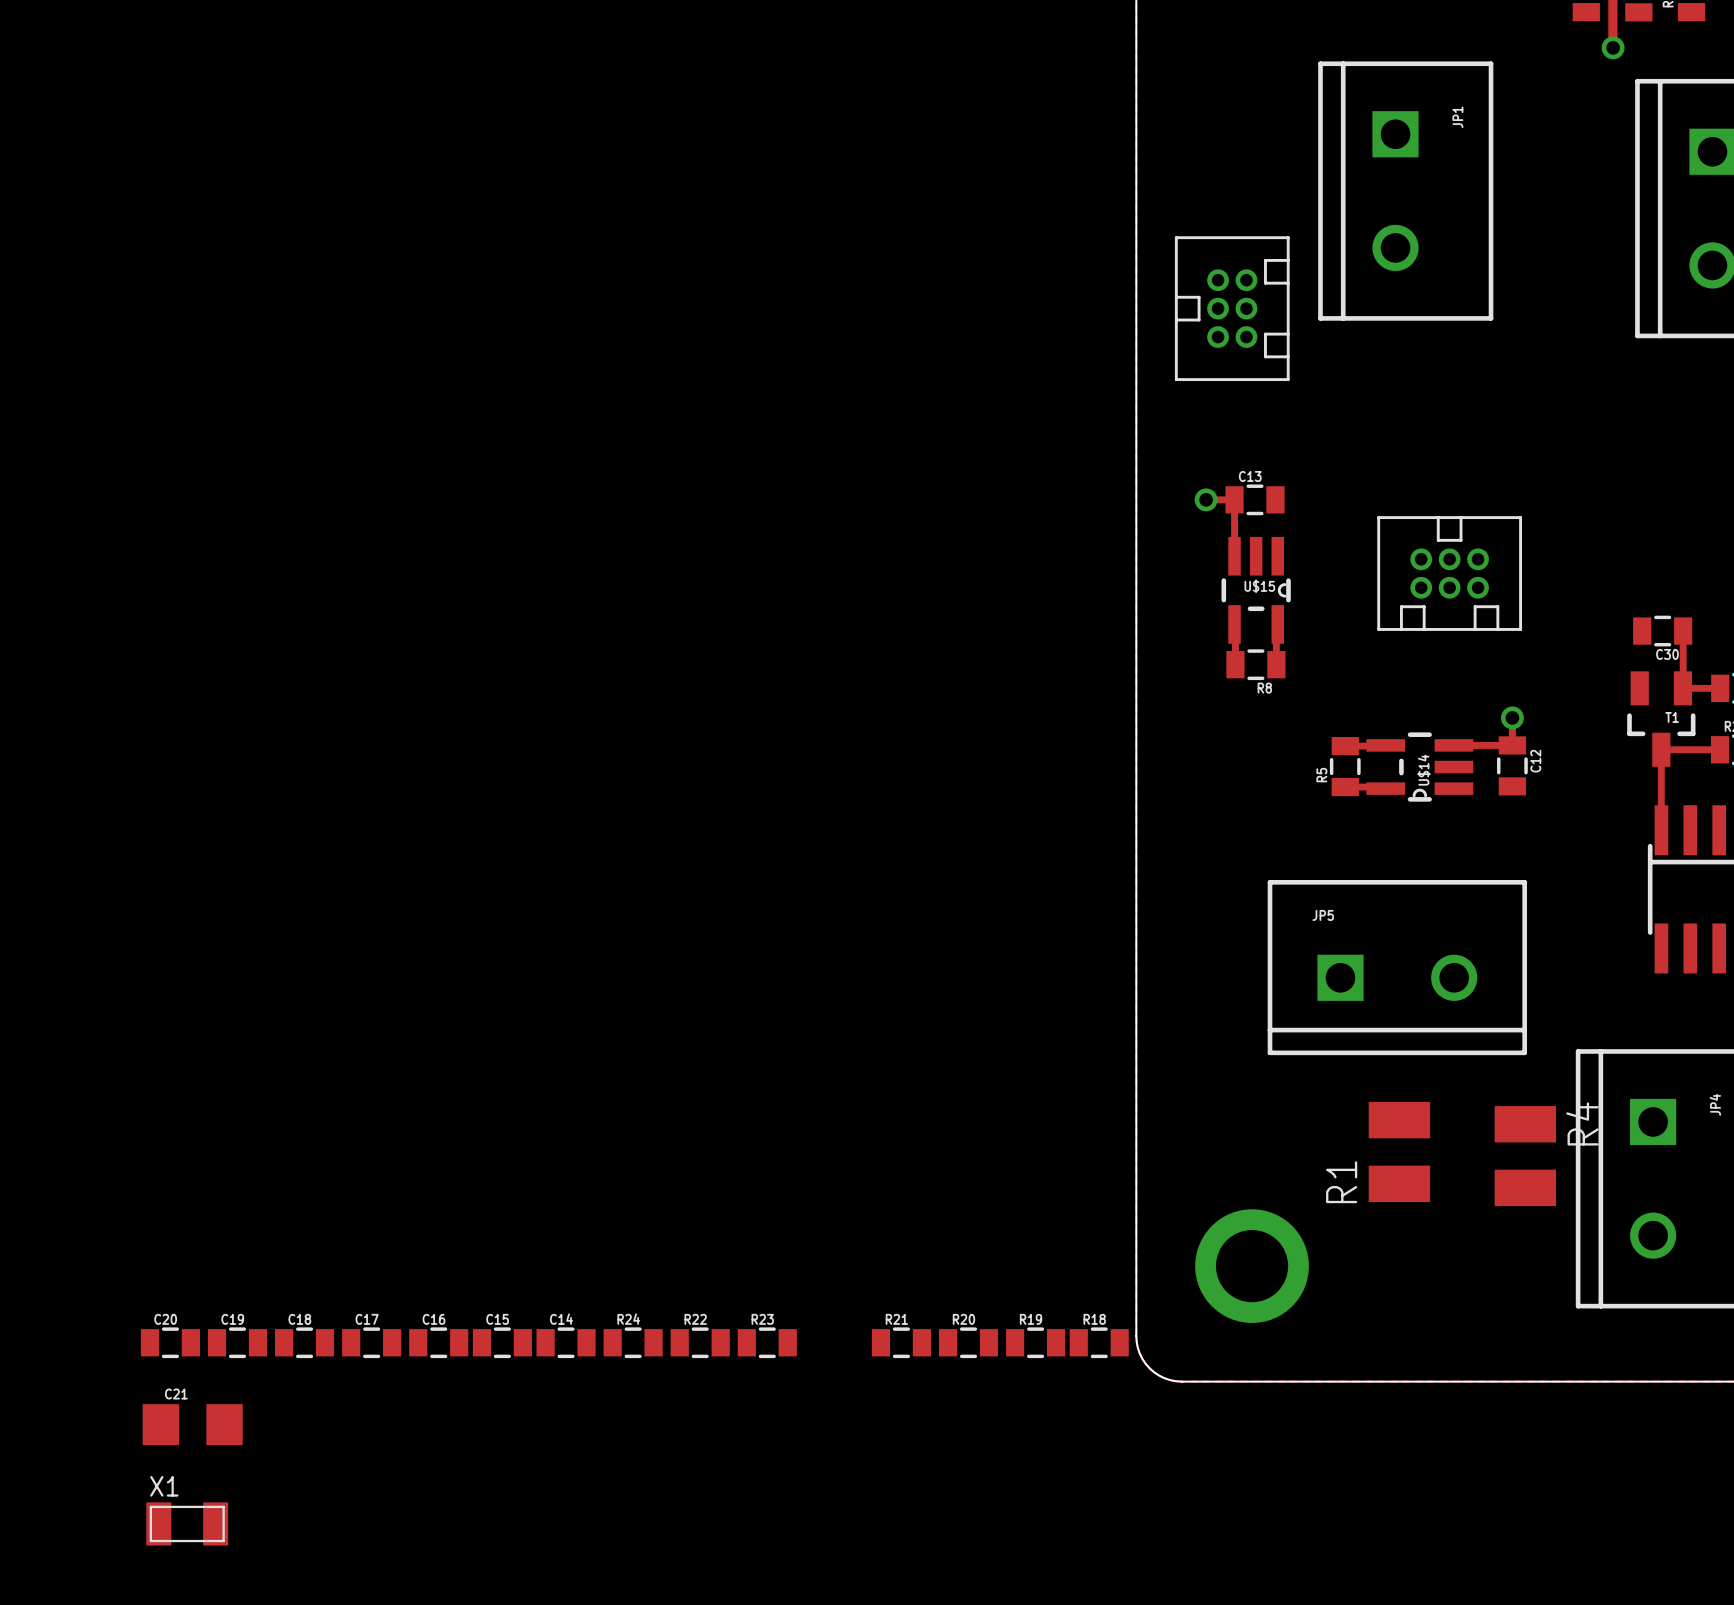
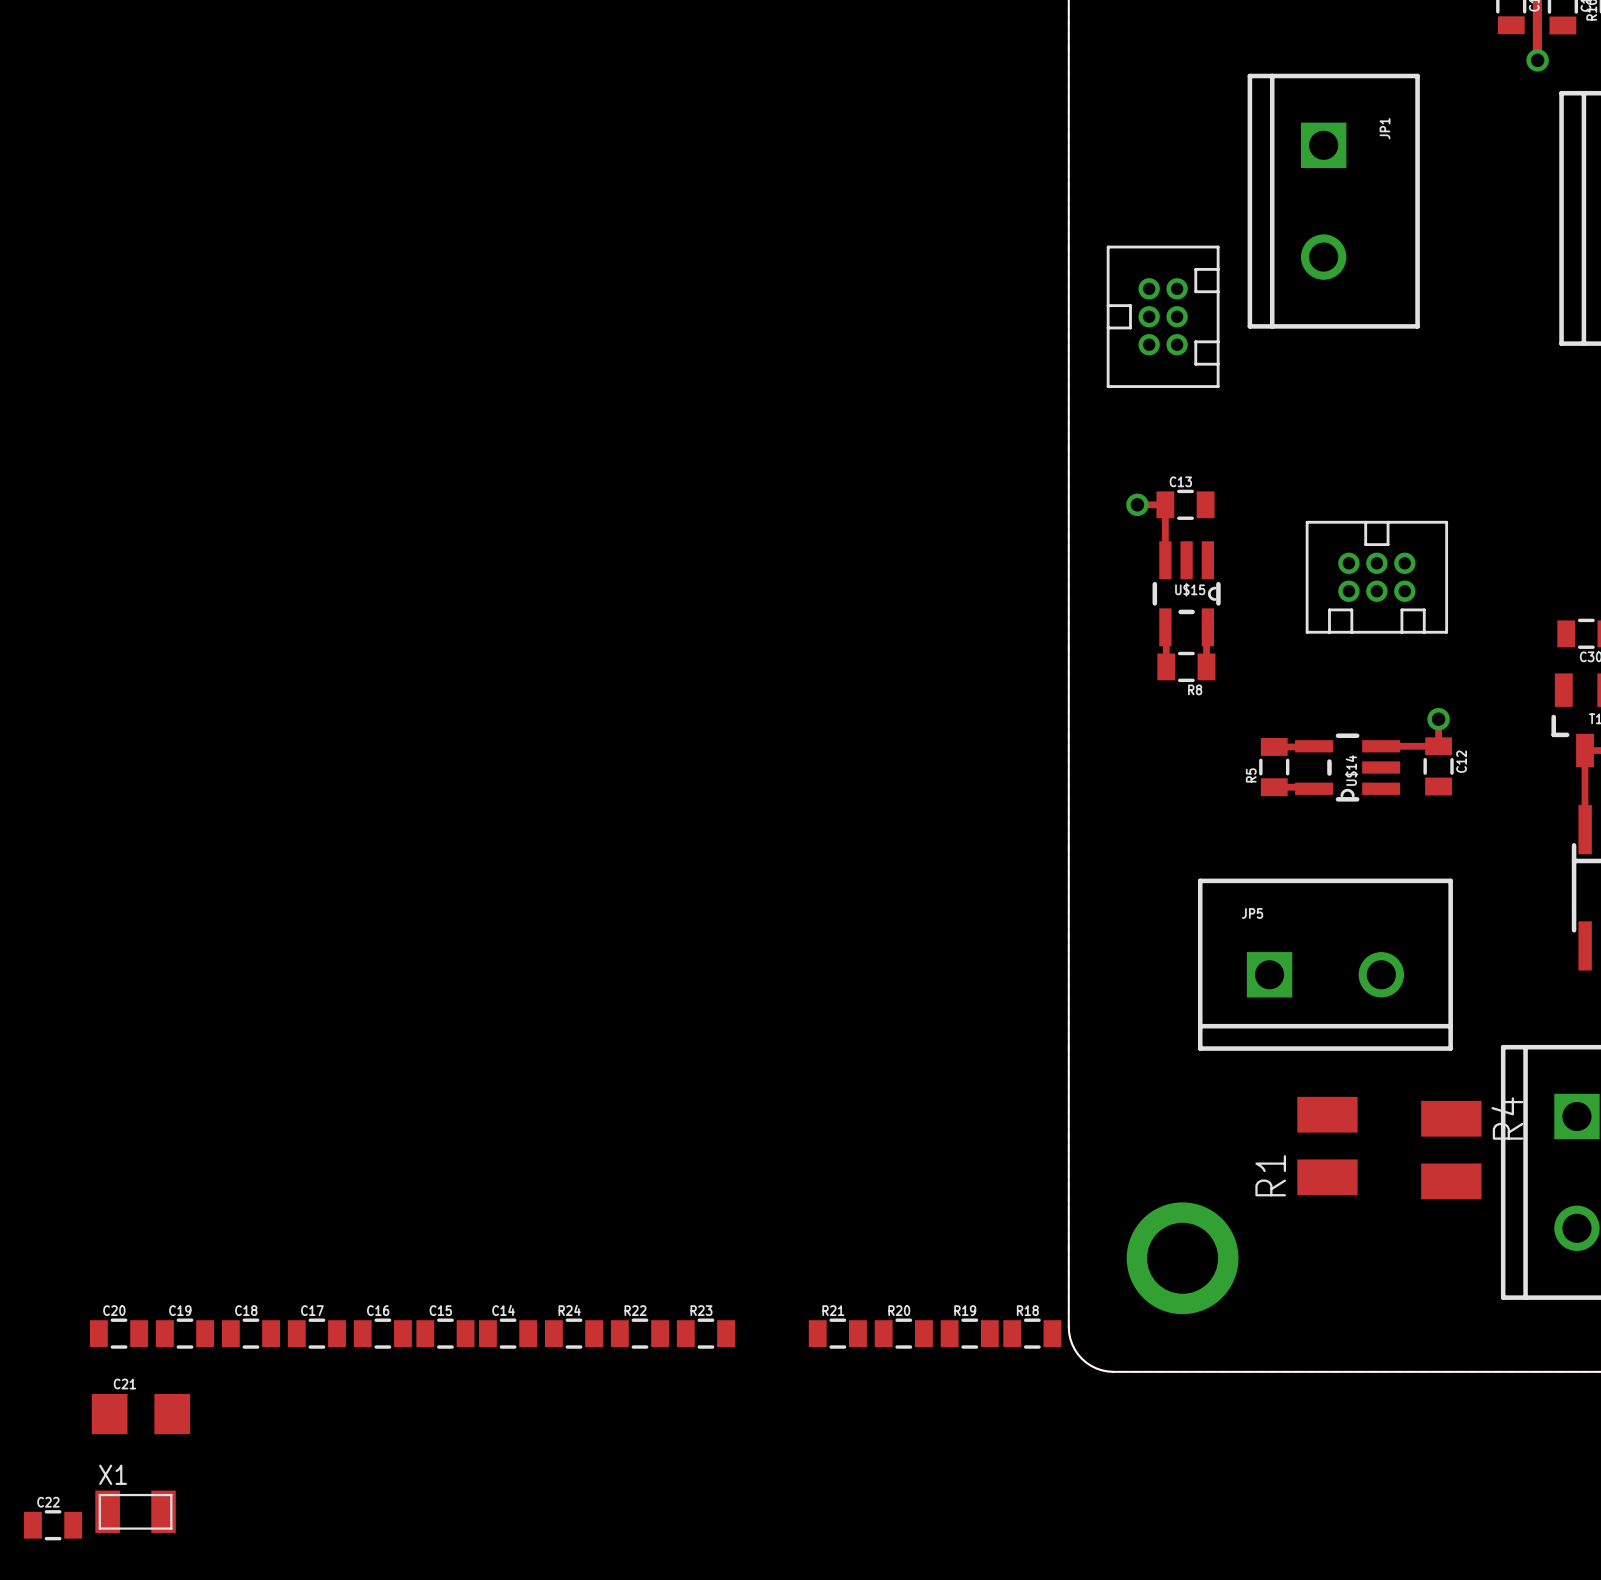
C22: none -> (53, 1525)

